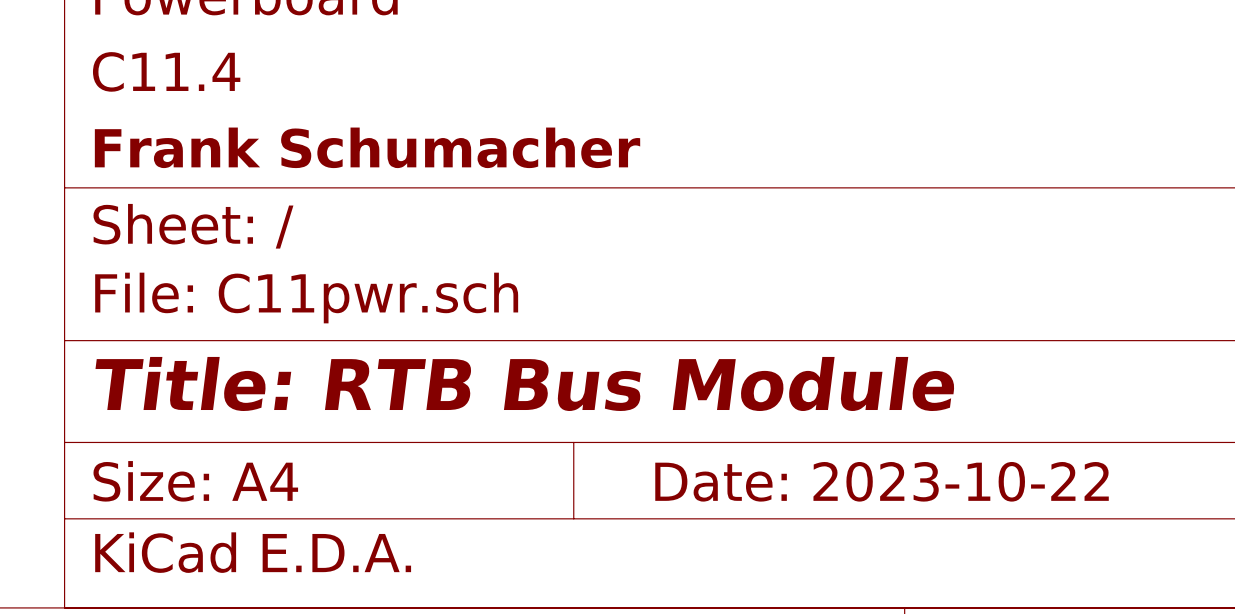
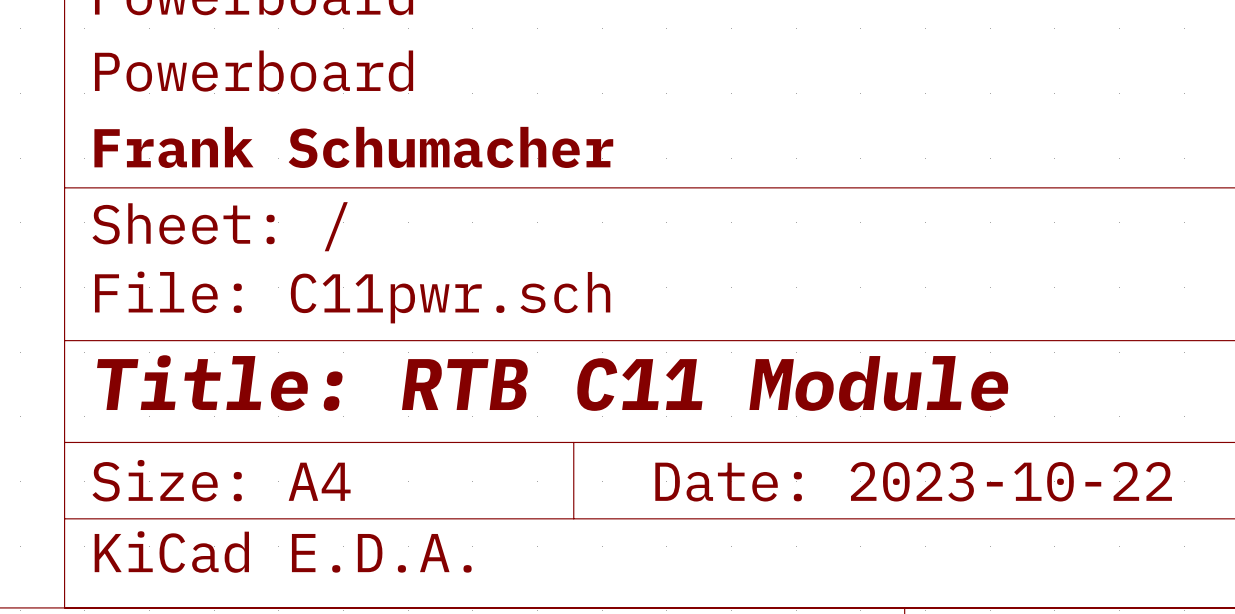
title block: C11.4 (166, 71) -> Powerboard (254, 71)
title block: Title: RTB Bus Module (525, 383) -> Title: RTB C11 Module (552, 383)

